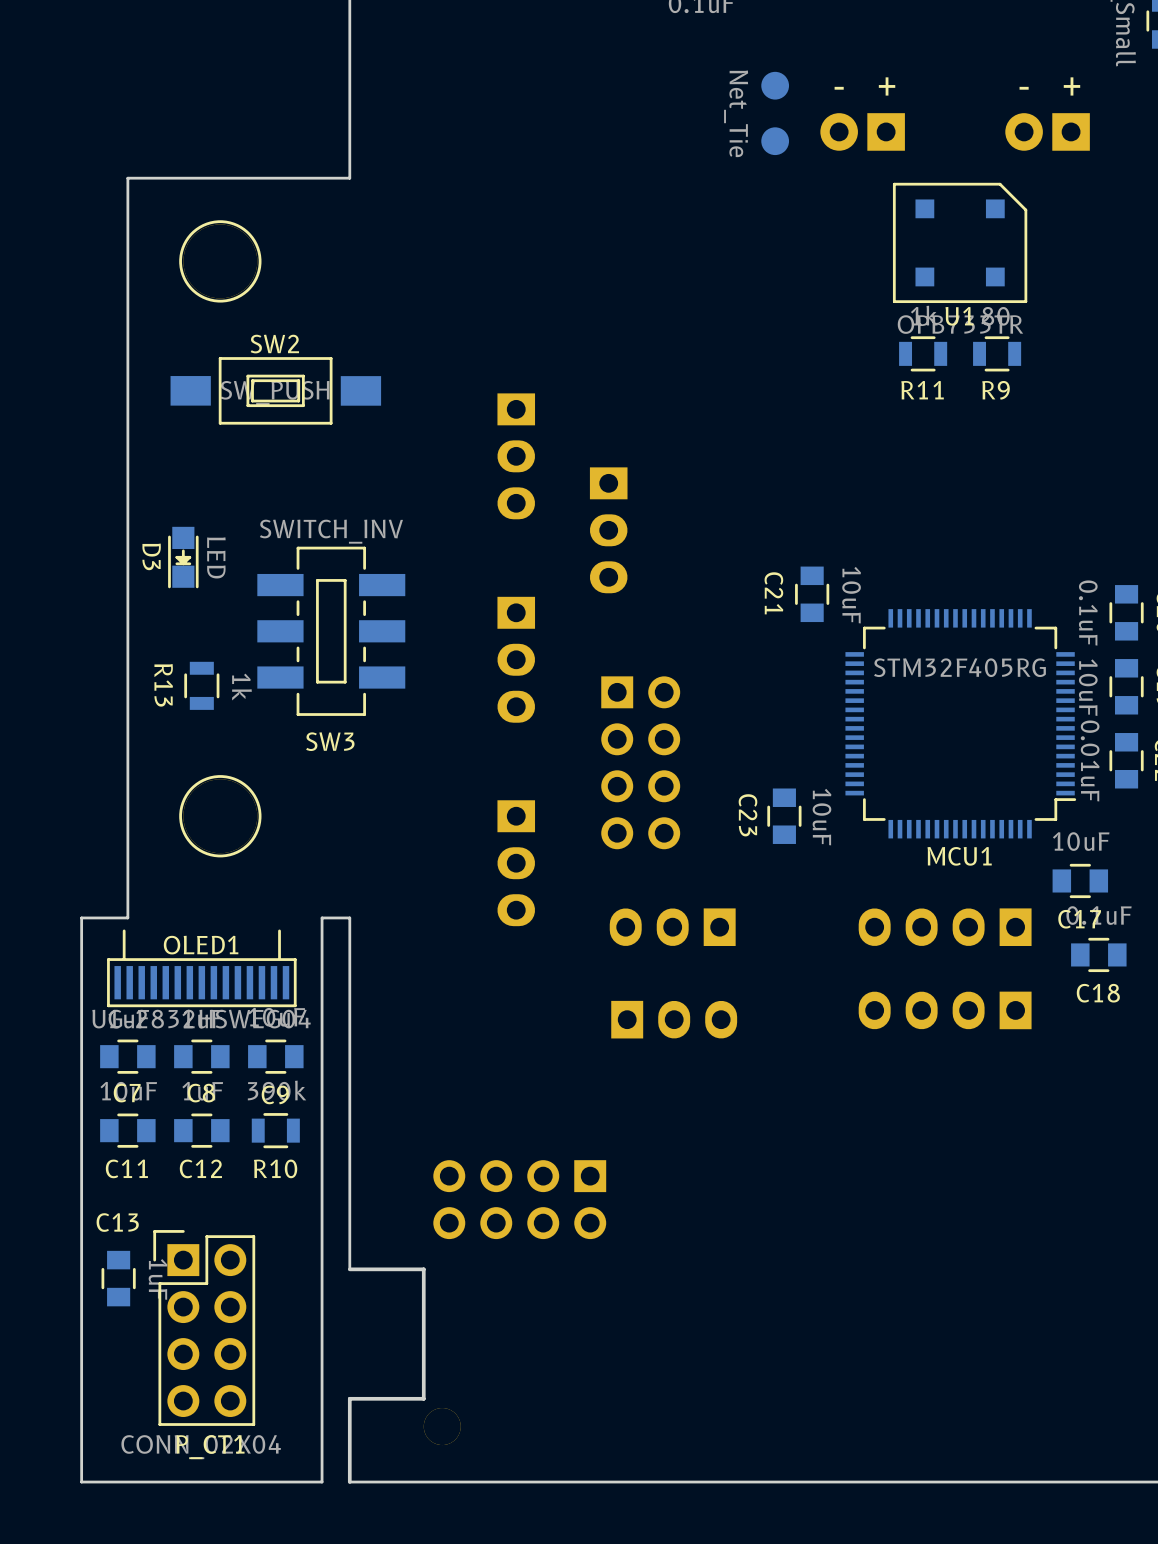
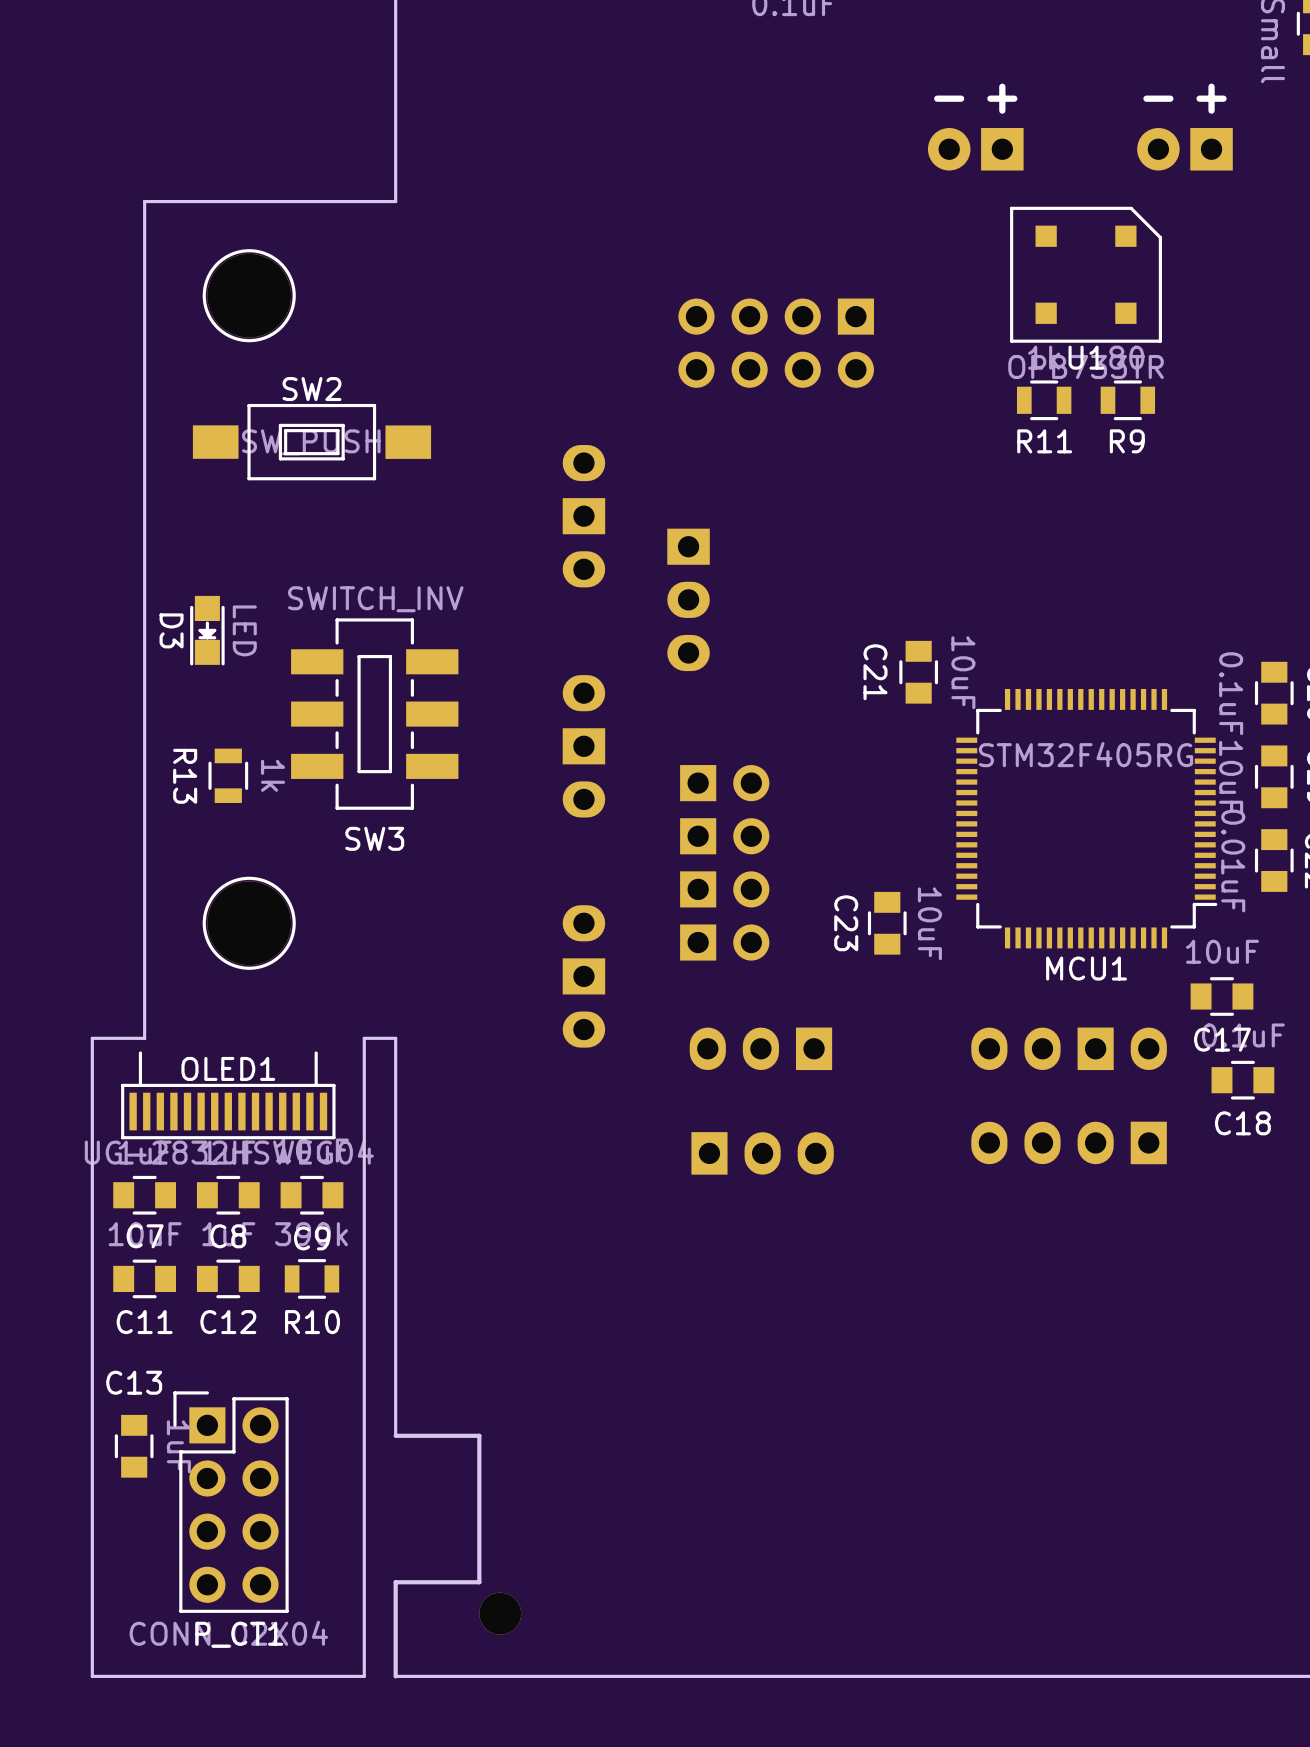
part: Net_Tie (775, 113) -> none
part: none -> (776, 343)
part footprint: [497, 393, 536, 520] -> [562, 444, 606, 588]
part footprint: [497, 596, 536, 723] -> [562, 675, 606, 818]
part footprint: [601, 676, 681, 850] -> [680, 765, 770, 961]
part footprint: [497, 800, 536, 927] -> [562, 905, 606, 1048]
part footprint: [858, 908, 1032, 946] -> [971, 1027, 1167, 1071]
part: (519, 1199) -> none

